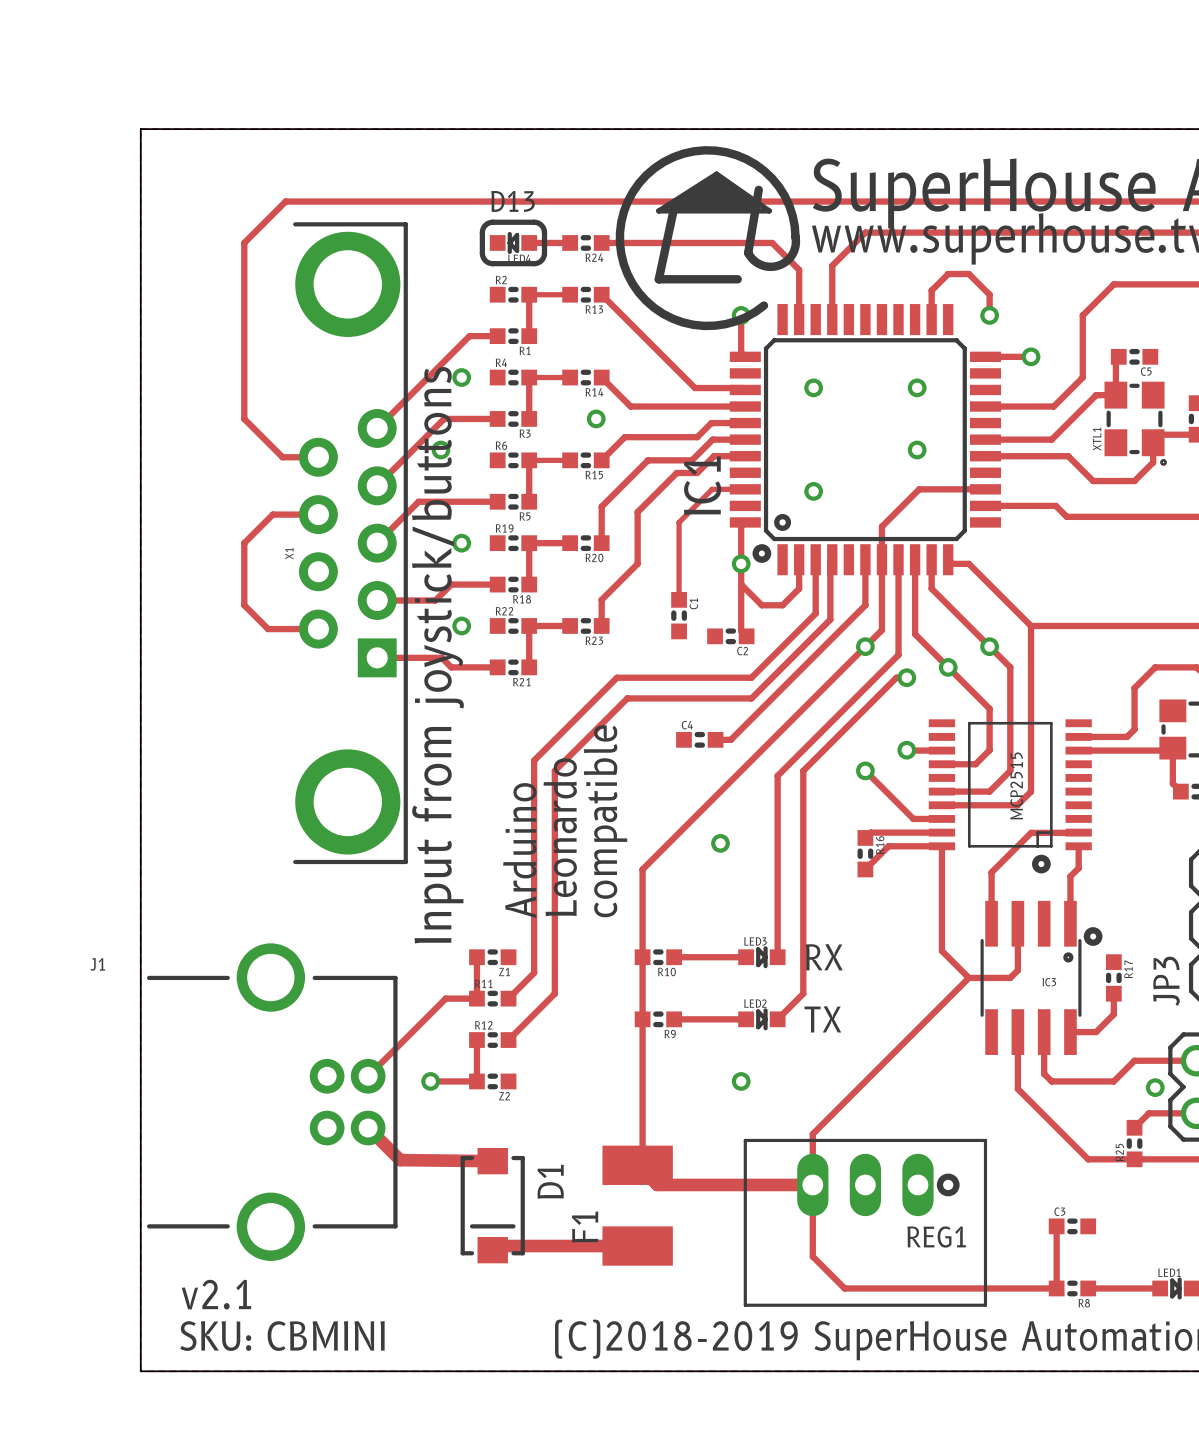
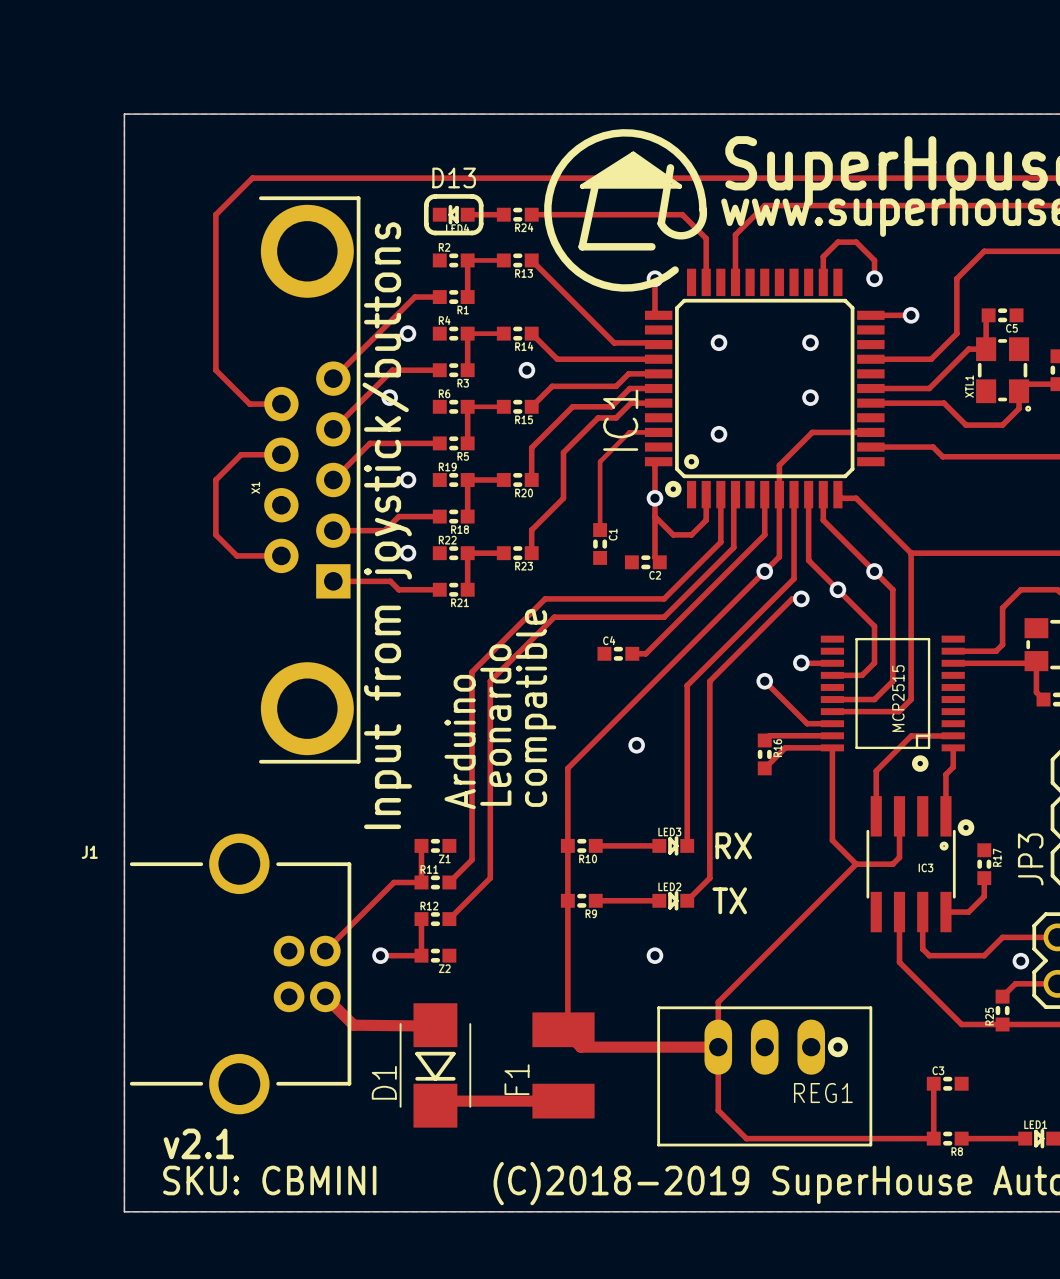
REG1 footprint: [743, 1138, 988, 1307] -> [657, 1006, 873, 1147]
D1 footprint: [460, 1148, 525, 1264] -> [399, 1003, 472, 1128]
D1 name position: D1 (550, 1181) -> D1 (384, 1082)

